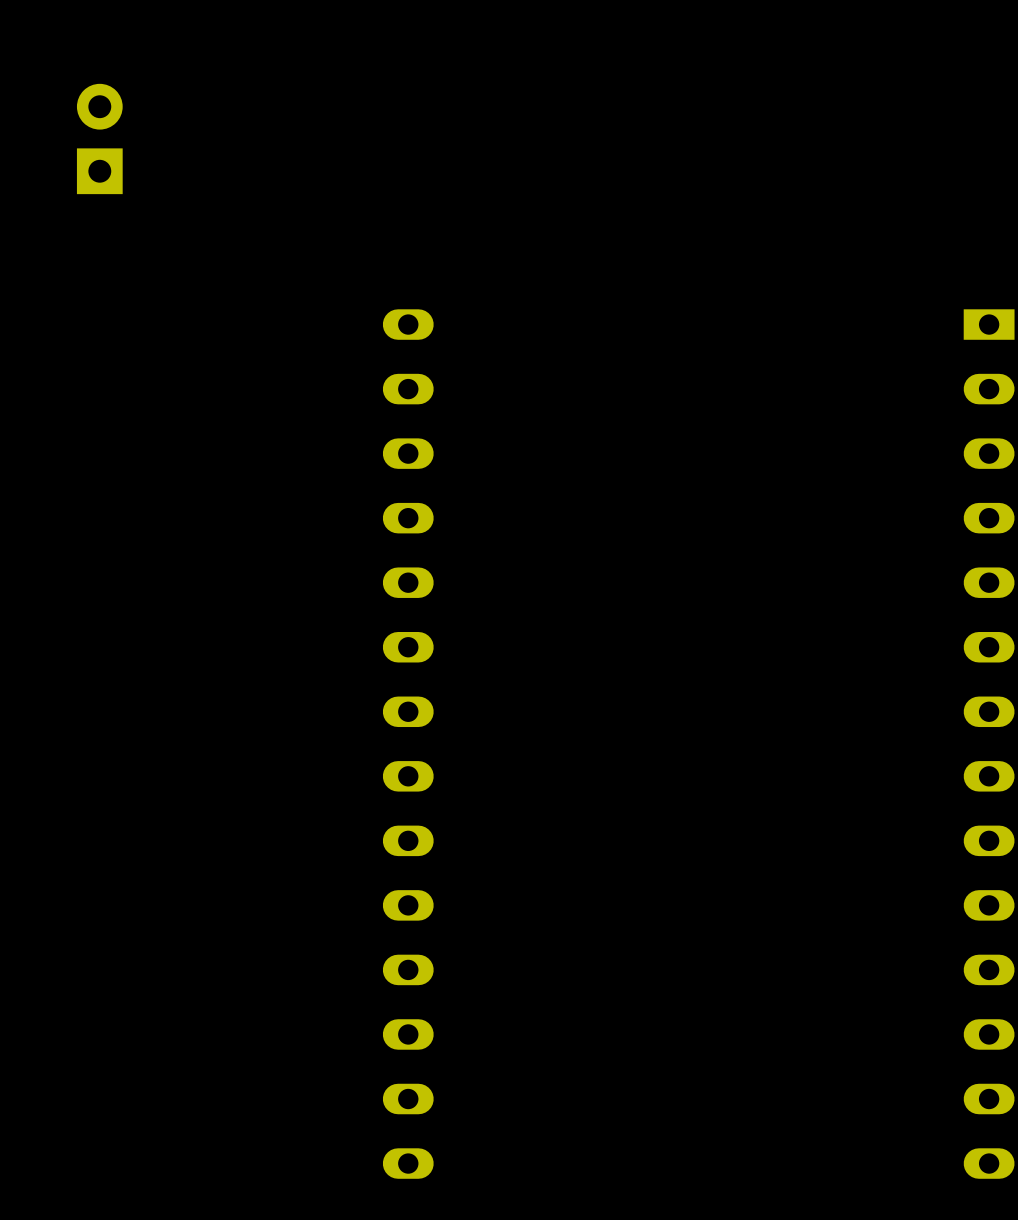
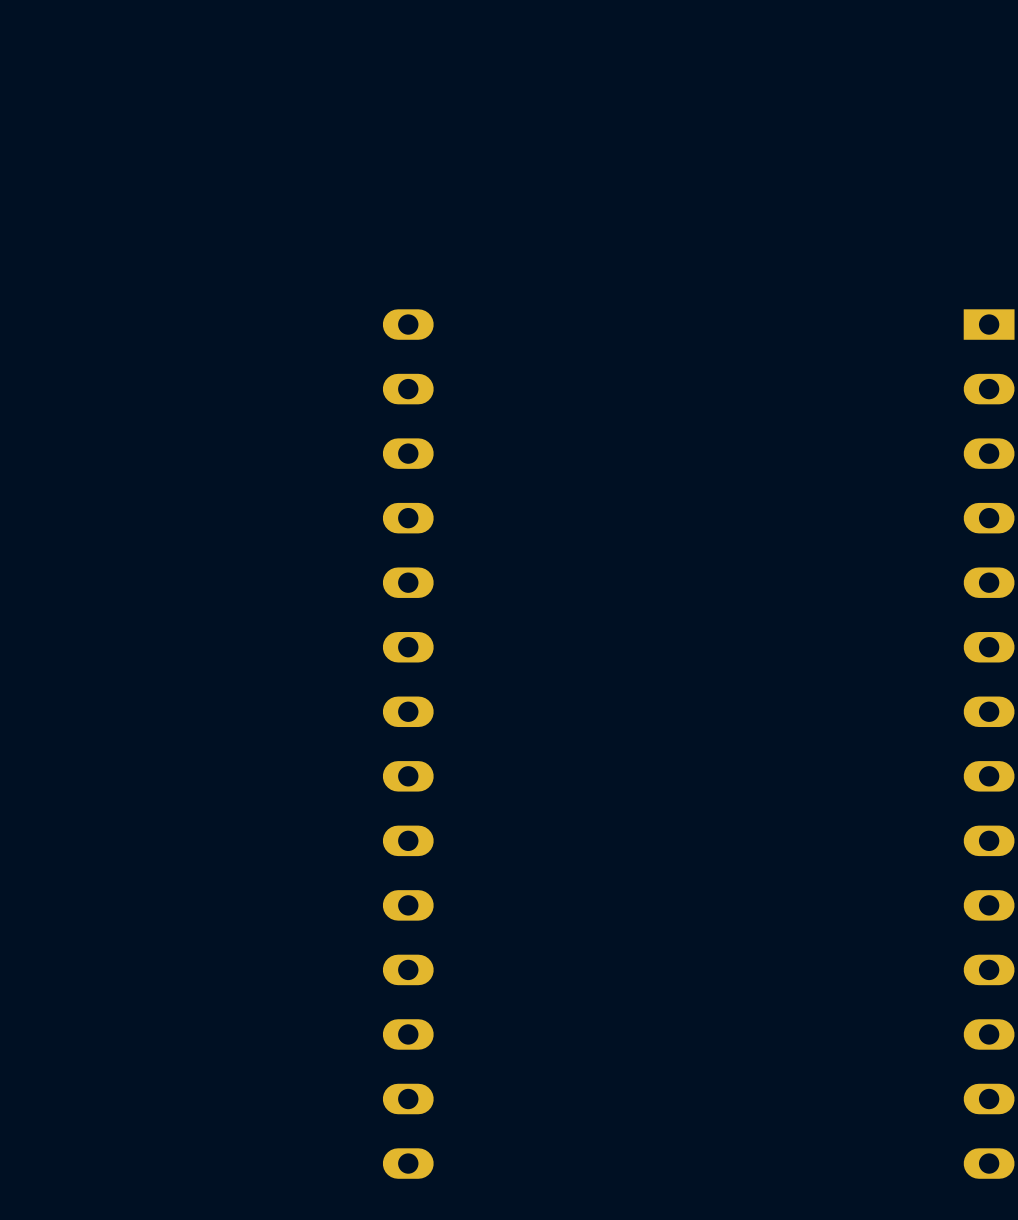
part: (99, 138) -> none

